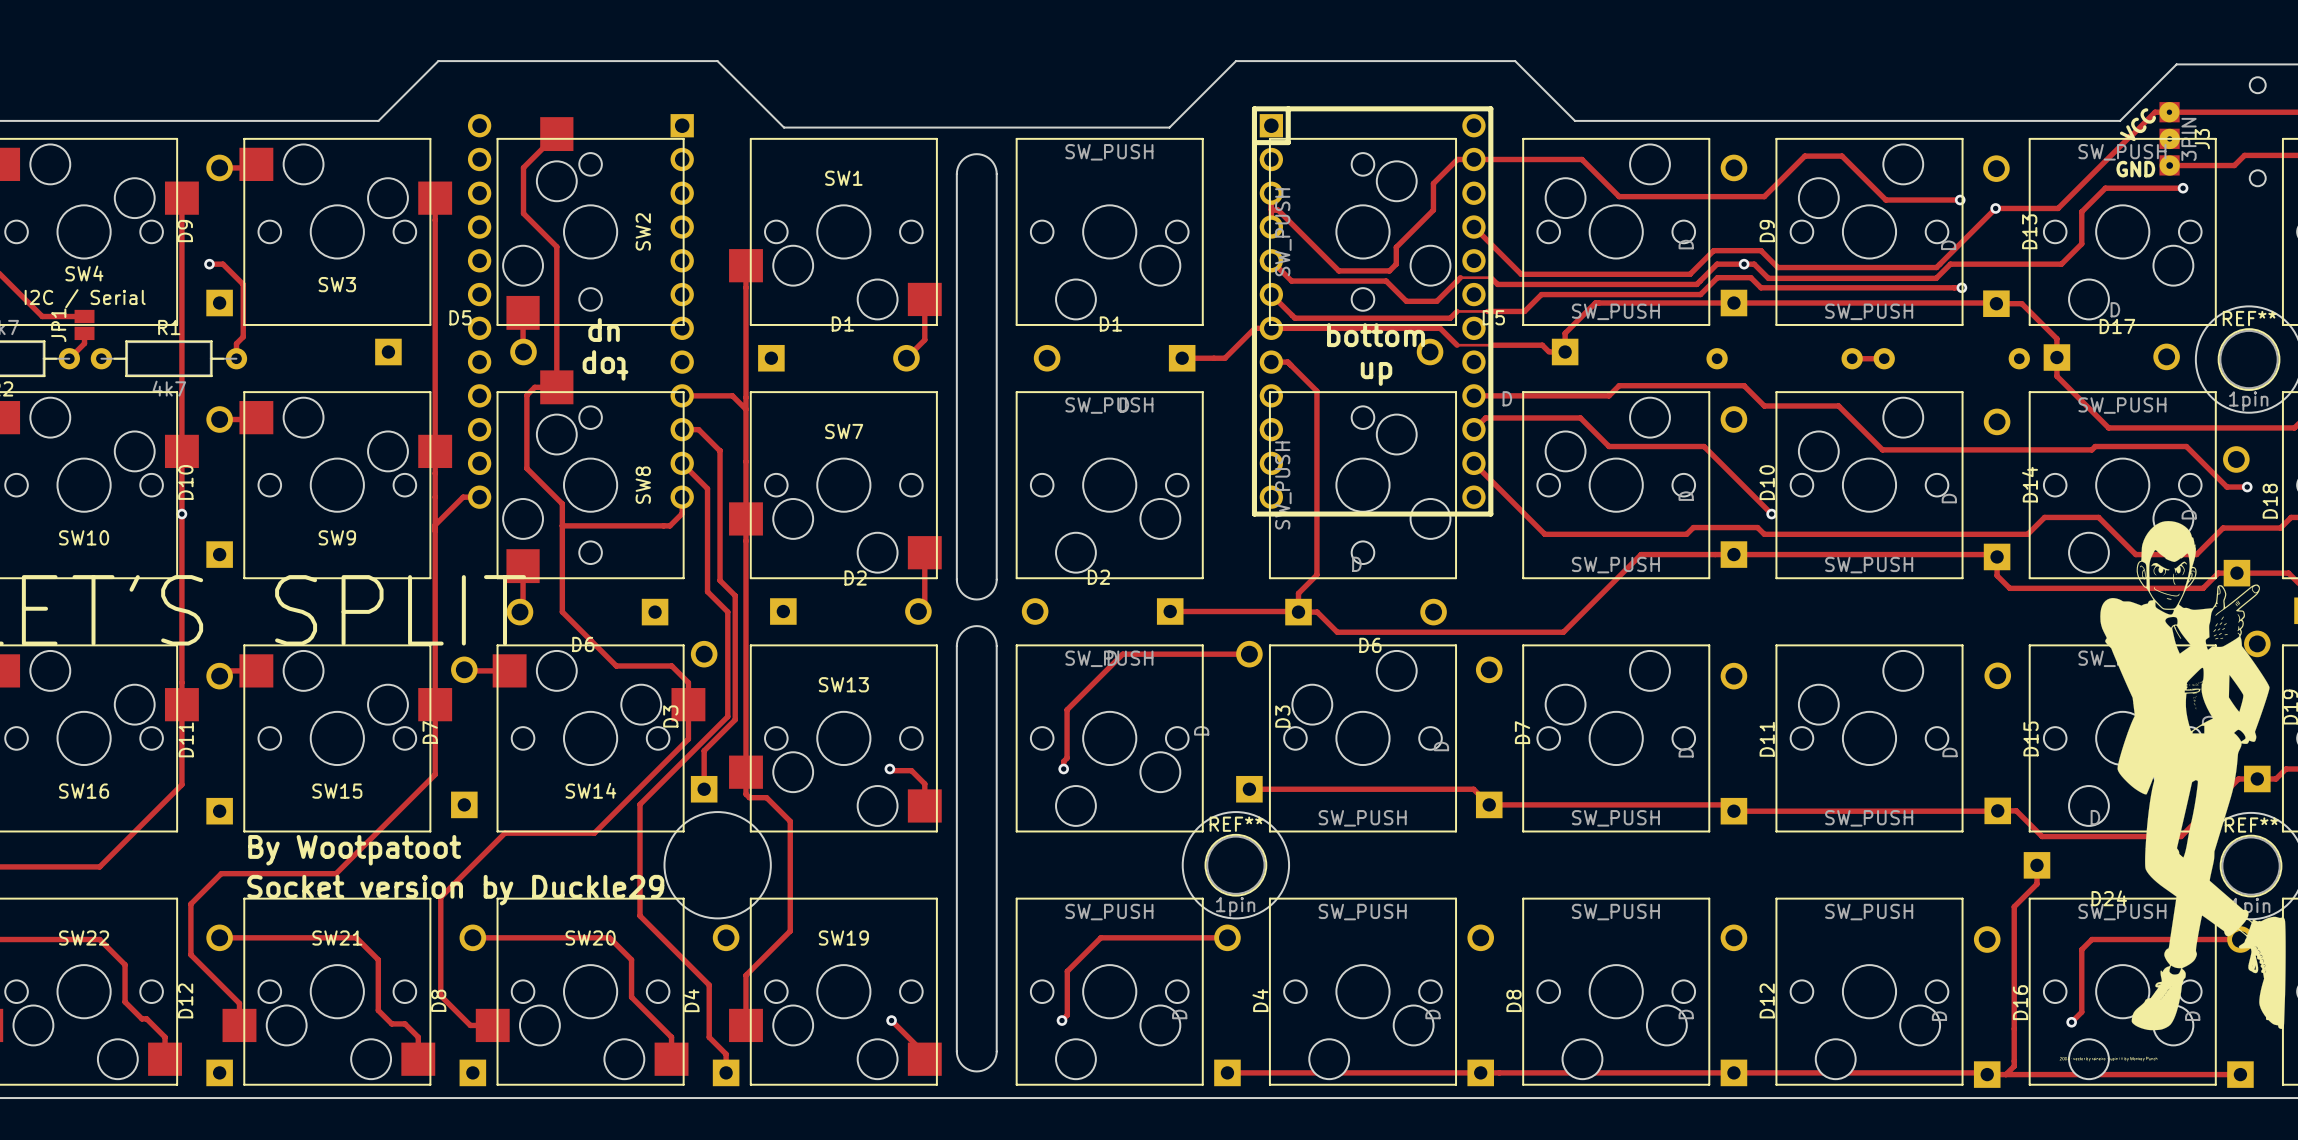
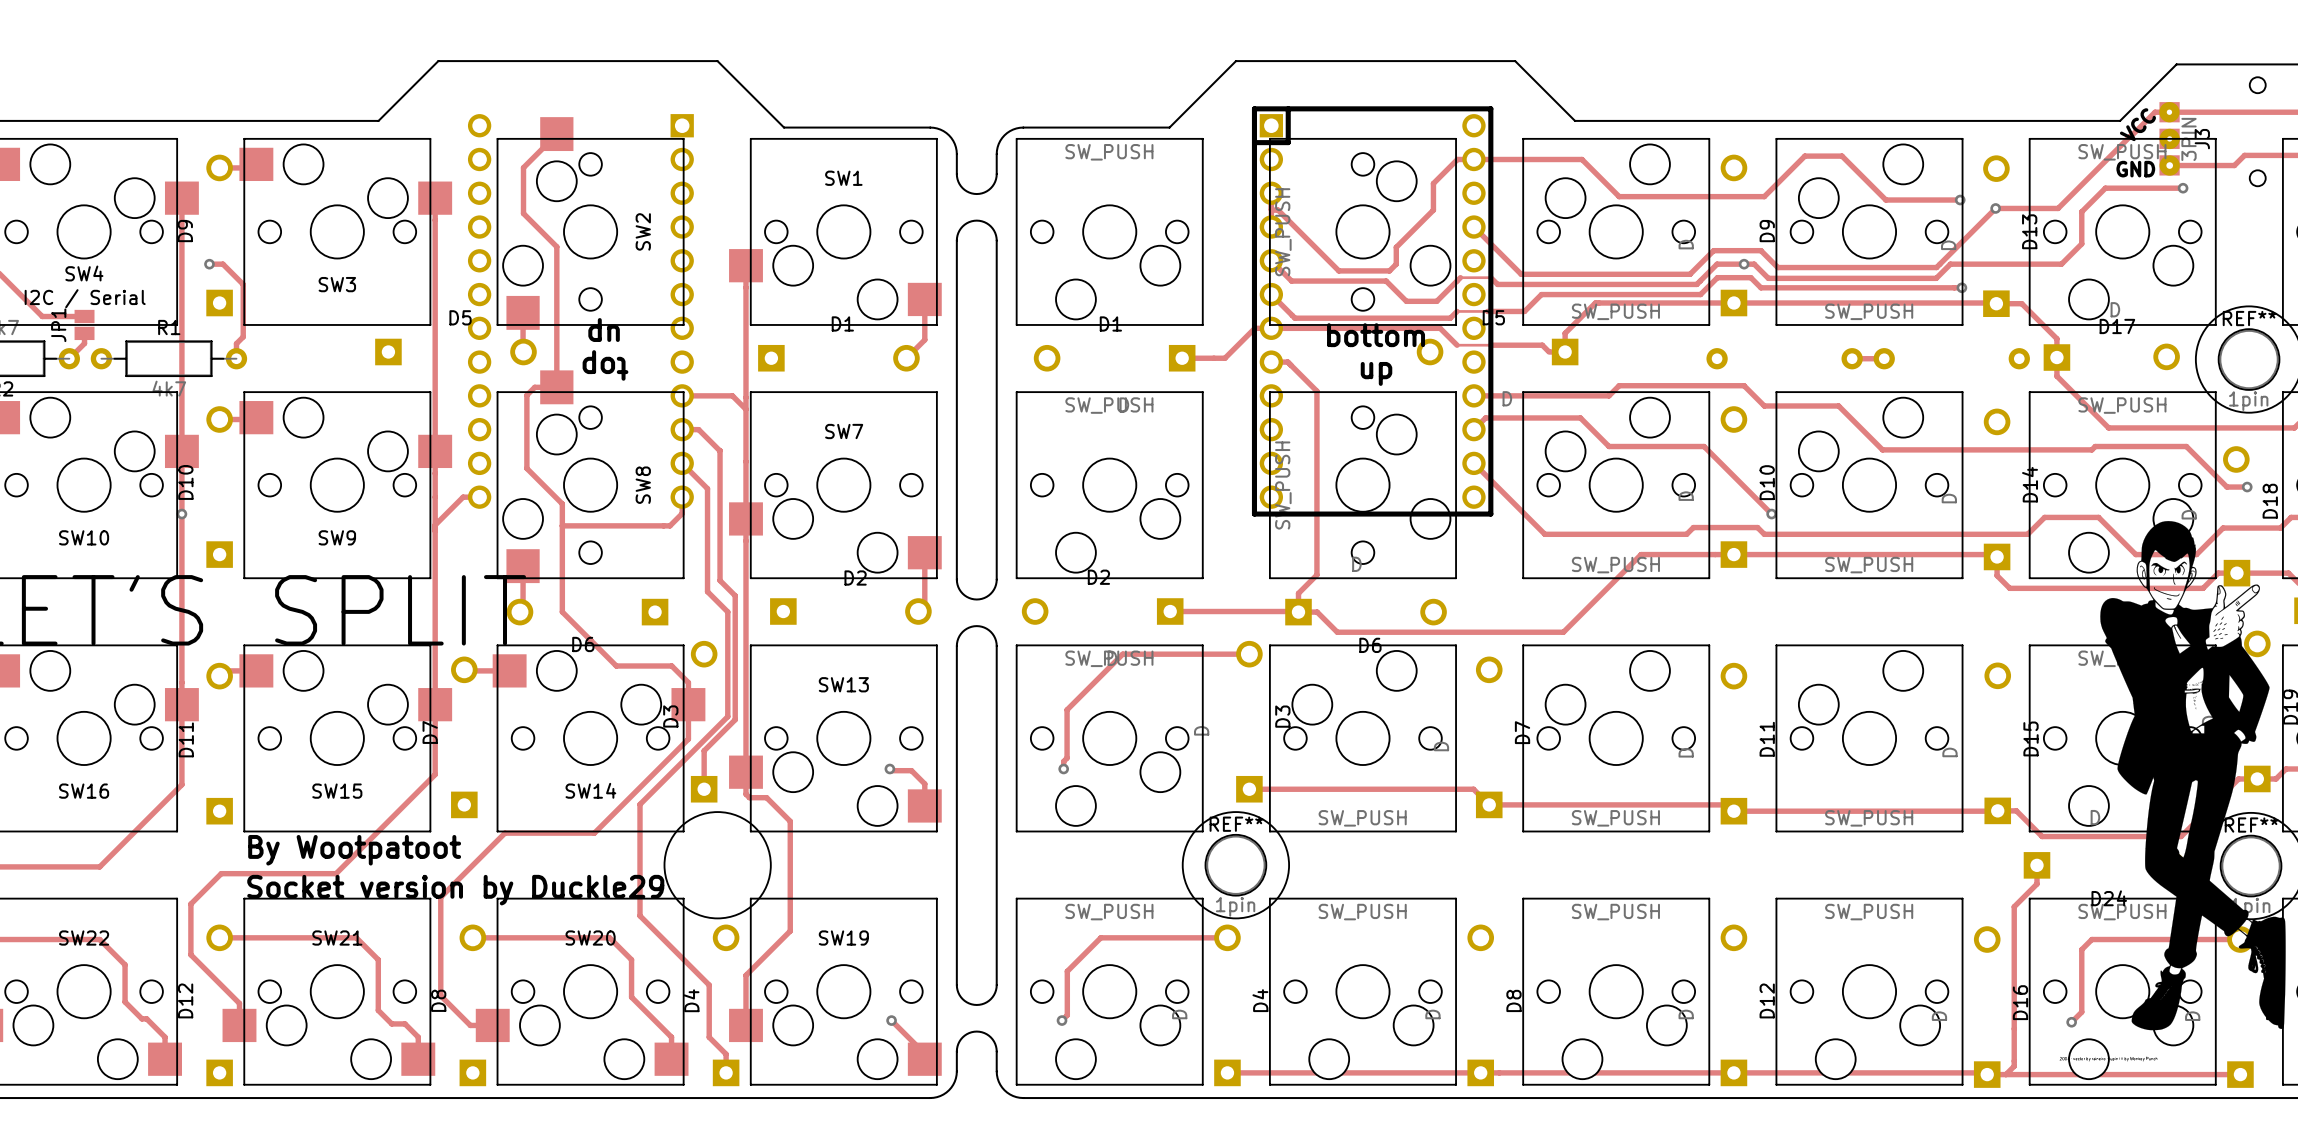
board edge: (930, 127) (1023, 127) -> (930, 127) (943, 131) (951, 137) (956, 150) (958, 181) (964, 189) (976, 194) (988, 189) (995, 181) (996, 150) (1002, 137) (1010, 131) (1023, 127)
board edge: (956, 240) (957, 168) (964, 158) (976, 154) (988, 158) (996, 168) (996, 240) -> (956, 240) (958, 232) (962, 226) (969, 222) (976, 220) (984, 222) (990, 226) (995, 232) (996, 240)
board edge: (956, 985) (957, 1056) (964, 1067) (976, 1071) (988, 1067) (996, 1056) (996, 985) -> (956, 985) (958, 992) (962, 999) (969, 1003) (976, 1004) (984, 1003) (990, 999) (995, 992) (996, 985)
board edge: (930, 1098) (1023, 1098) -> (930, 1098) (940, 1096) (951, 1087) (956, 1074) (958, 1043) (964, 1035) (976, 1031) (988, 1035) (995, 1043) (996, 1074) (1002, 1087) (1013, 1096) (1023, 1098)

